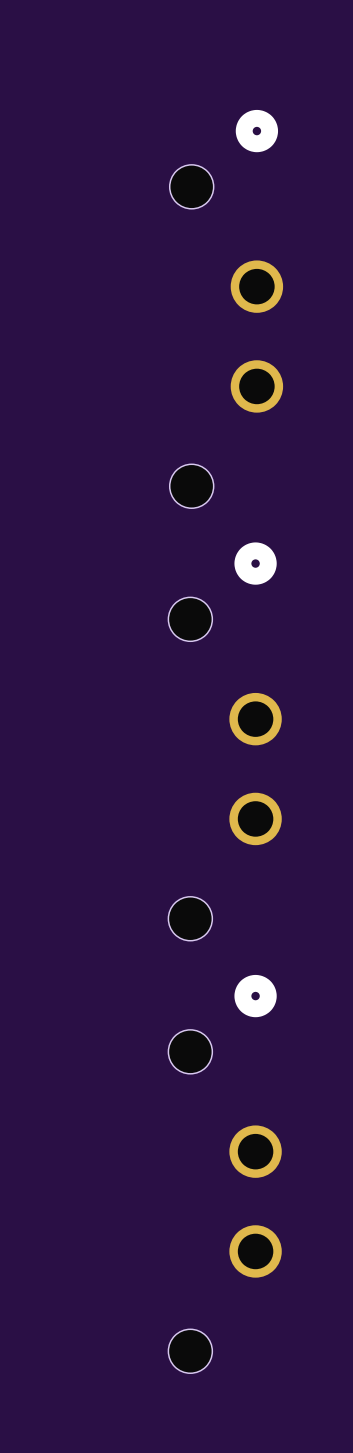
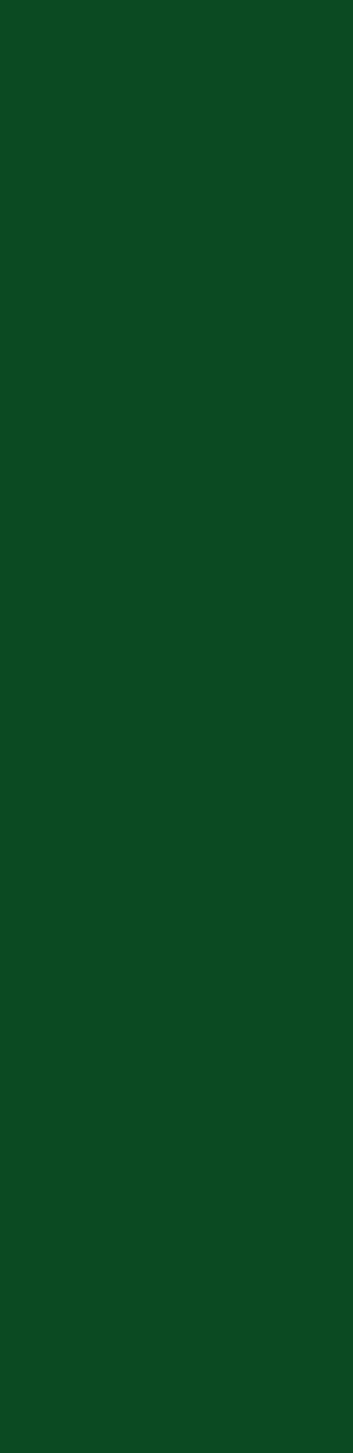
part: (226, 309) -> none
part: (225, 741) -> none
part: (225, 1174) -> none

